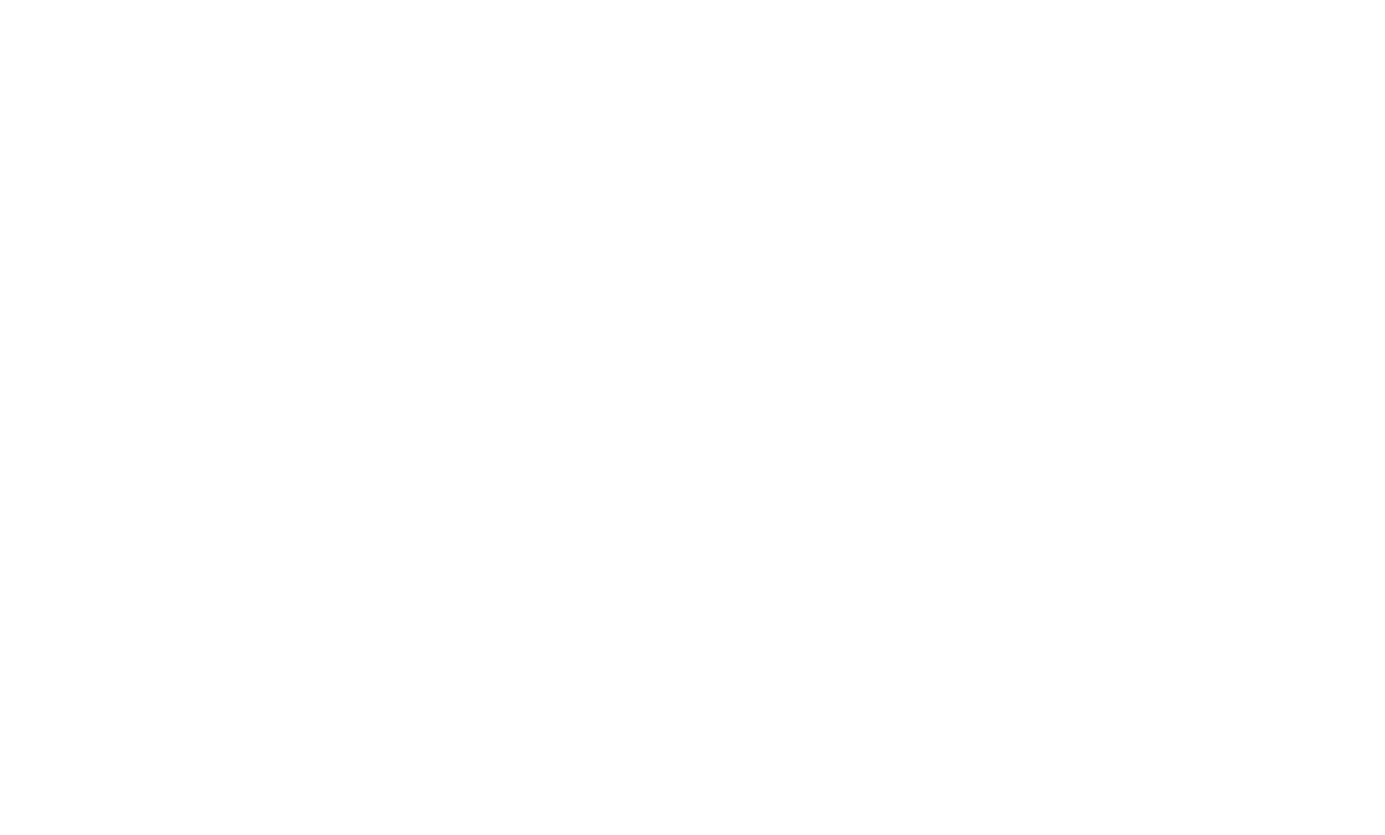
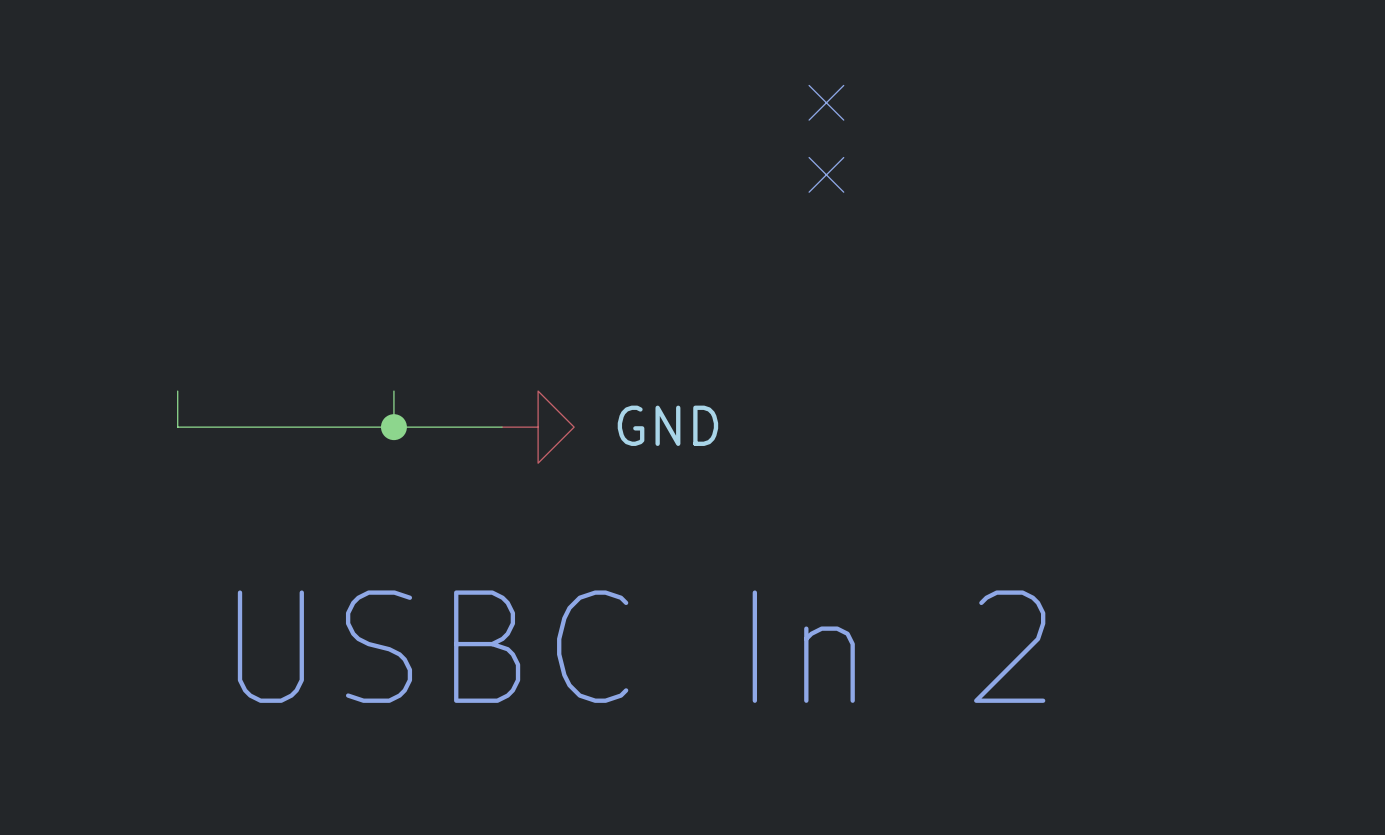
no-connect mark: none -> (826, 102)
no-connect mark: none -> (826, 174)
wire: none -> (177, 391) (177, 427) (502, 427)
wire: none -> (393, 391) (393, 427)
junction: none -> (393, 427)
power symbol: none -> GND (538, 427)
text: none -> USBC In 2 (641, 646)

